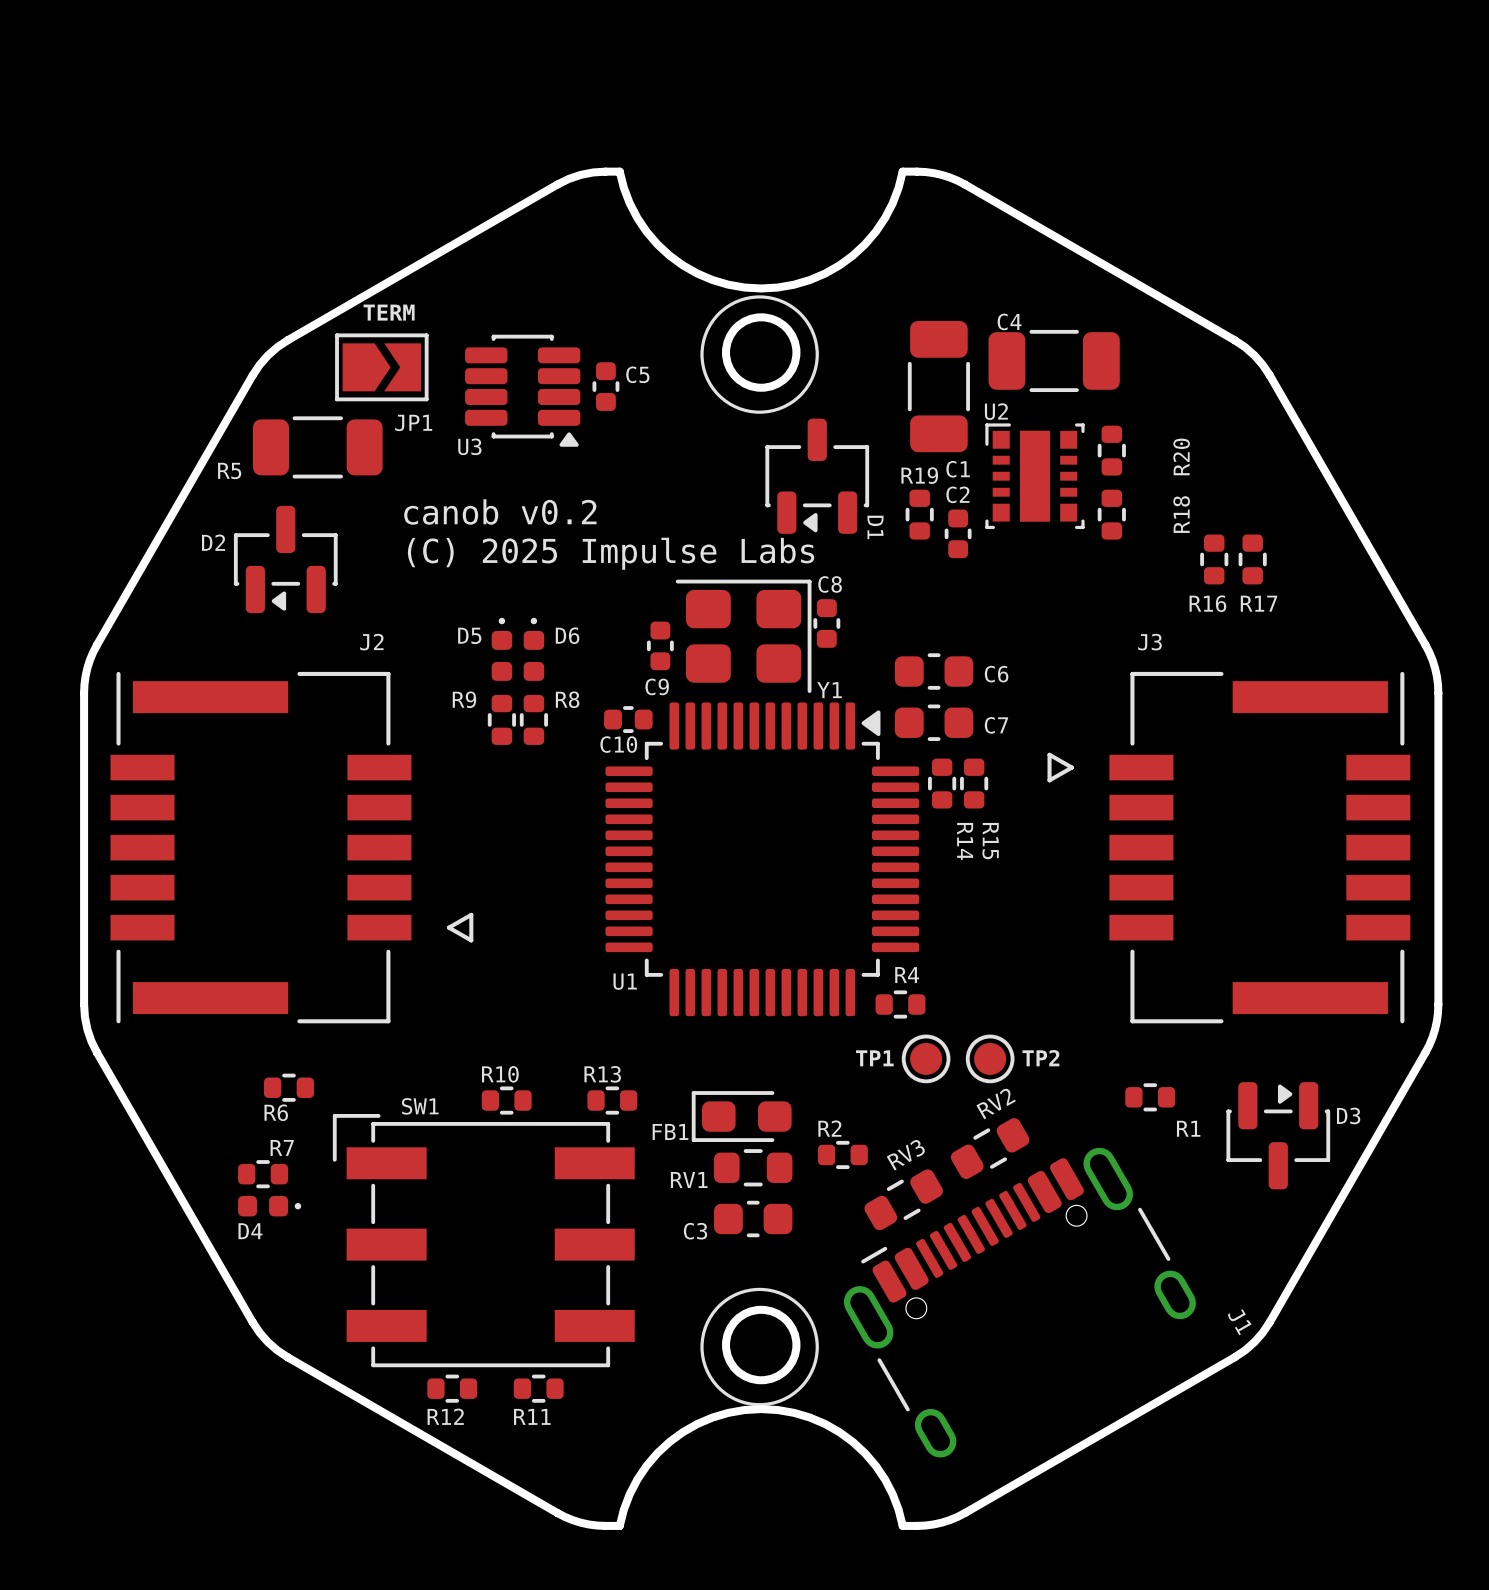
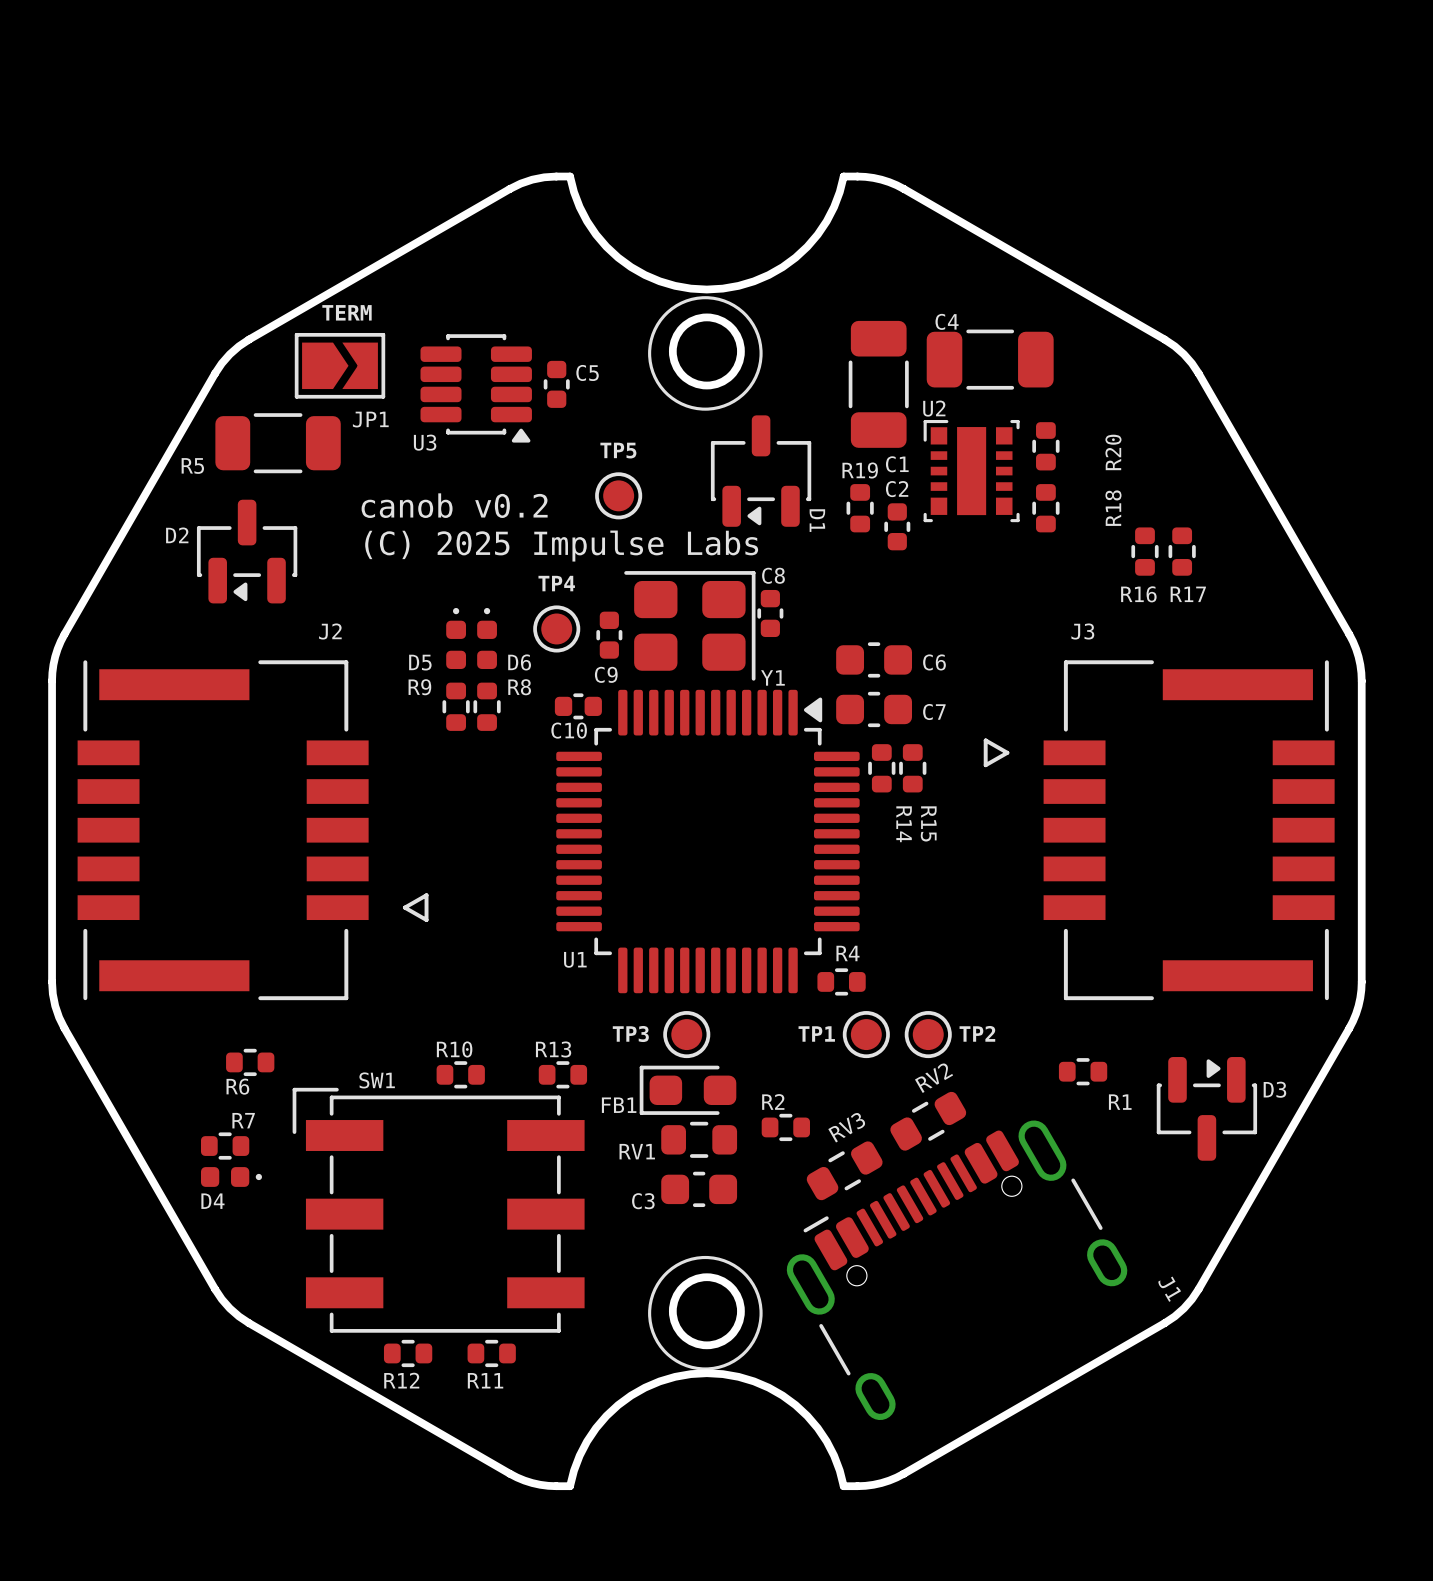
TP5: none -> (618, 495)
D5 name position: D5 (469, 635) -> D5 (420, 662)
D6 name position: D6 (567, 635) -> D6 (519, 662)
TP4: none -> (556, 628)
TP3: none -> (686, 1034)

